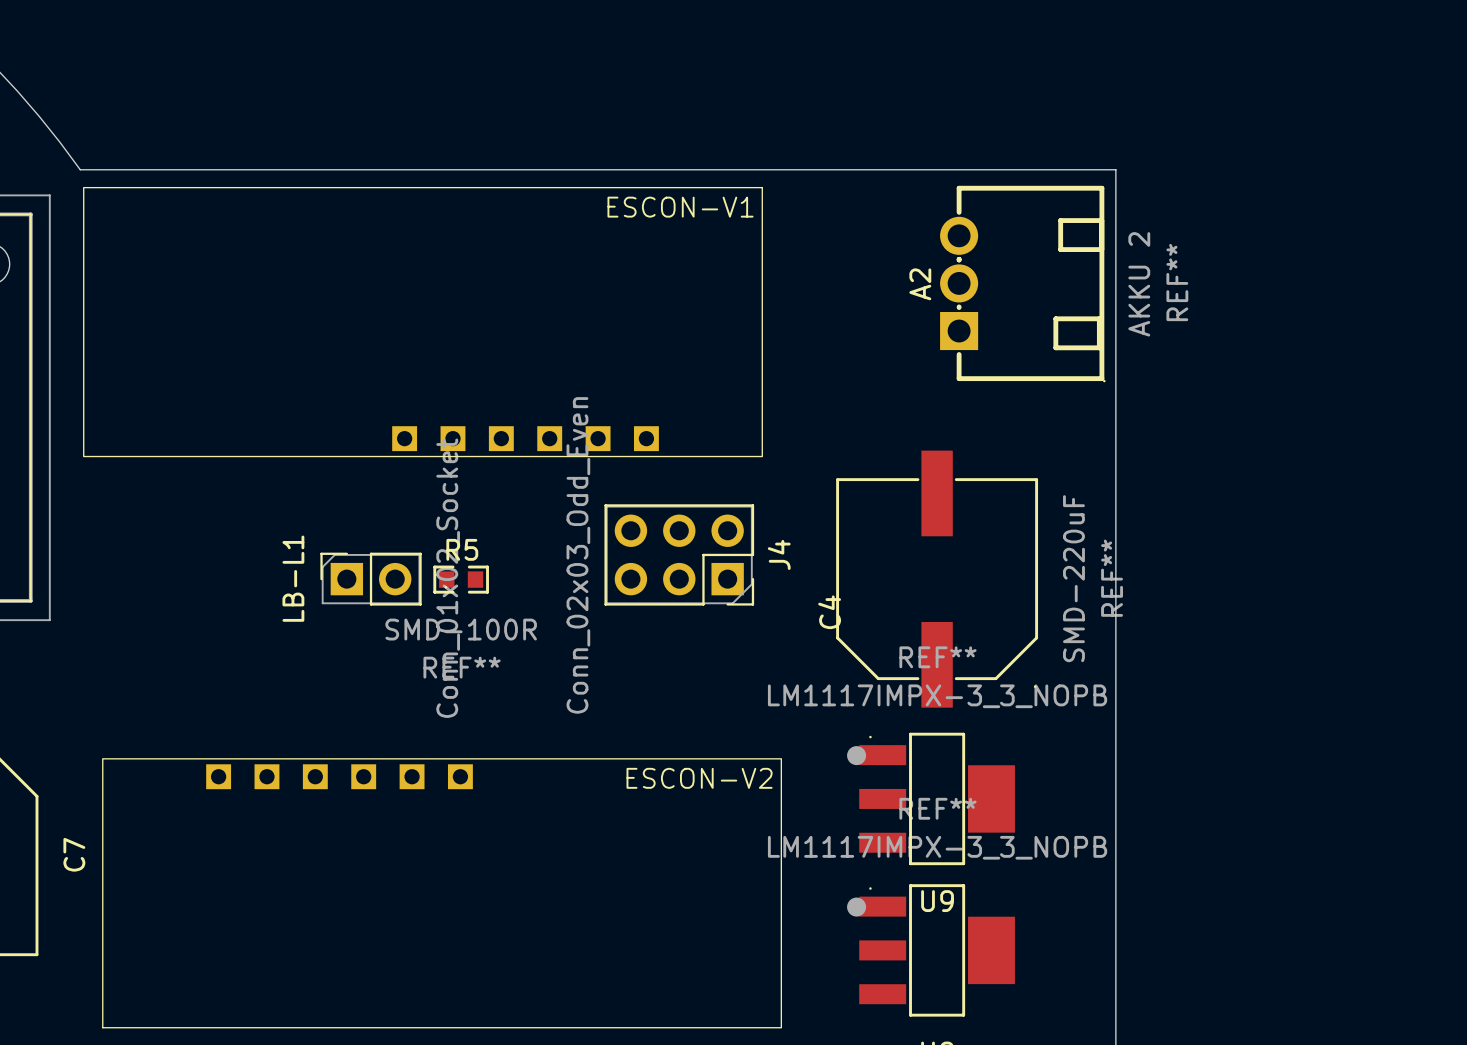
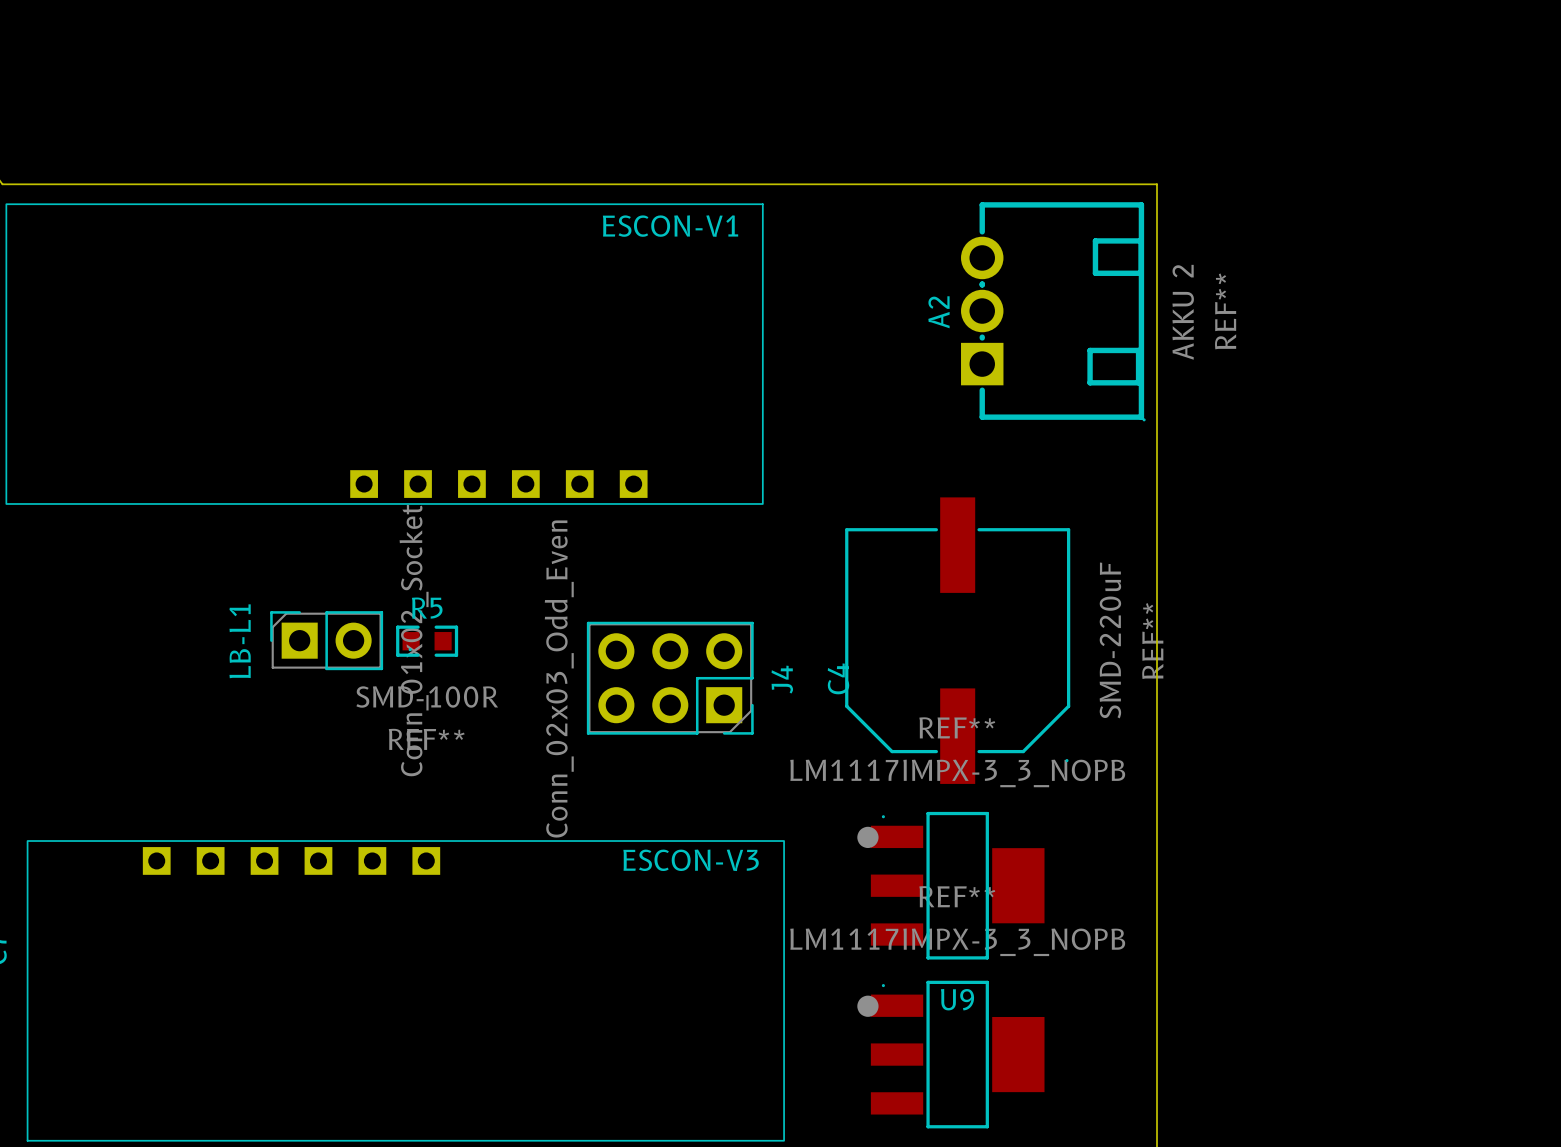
J4 position: (679, 554) -> (670, 678)
ESCON-V2 name: ESCON-V2 (699, 778) -> ESCON-V3 (691, 860)

